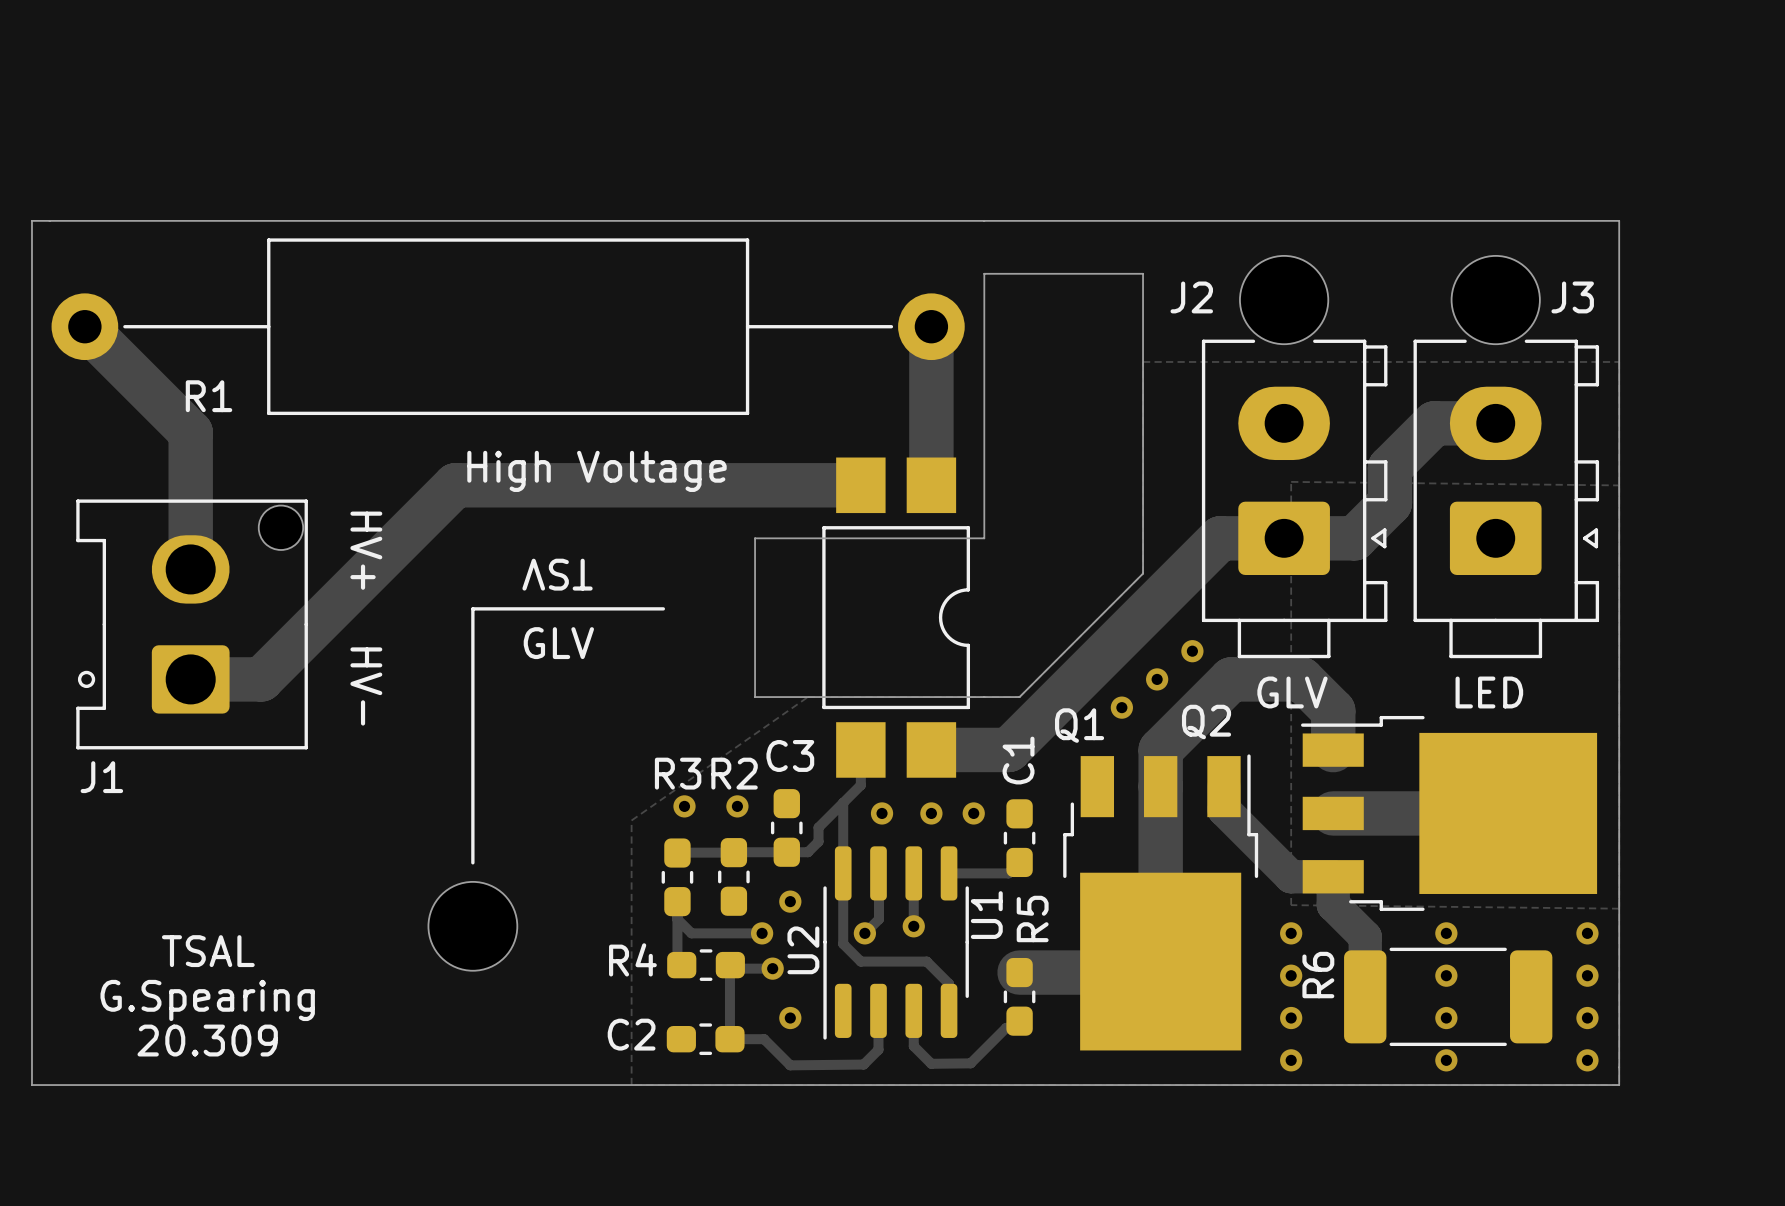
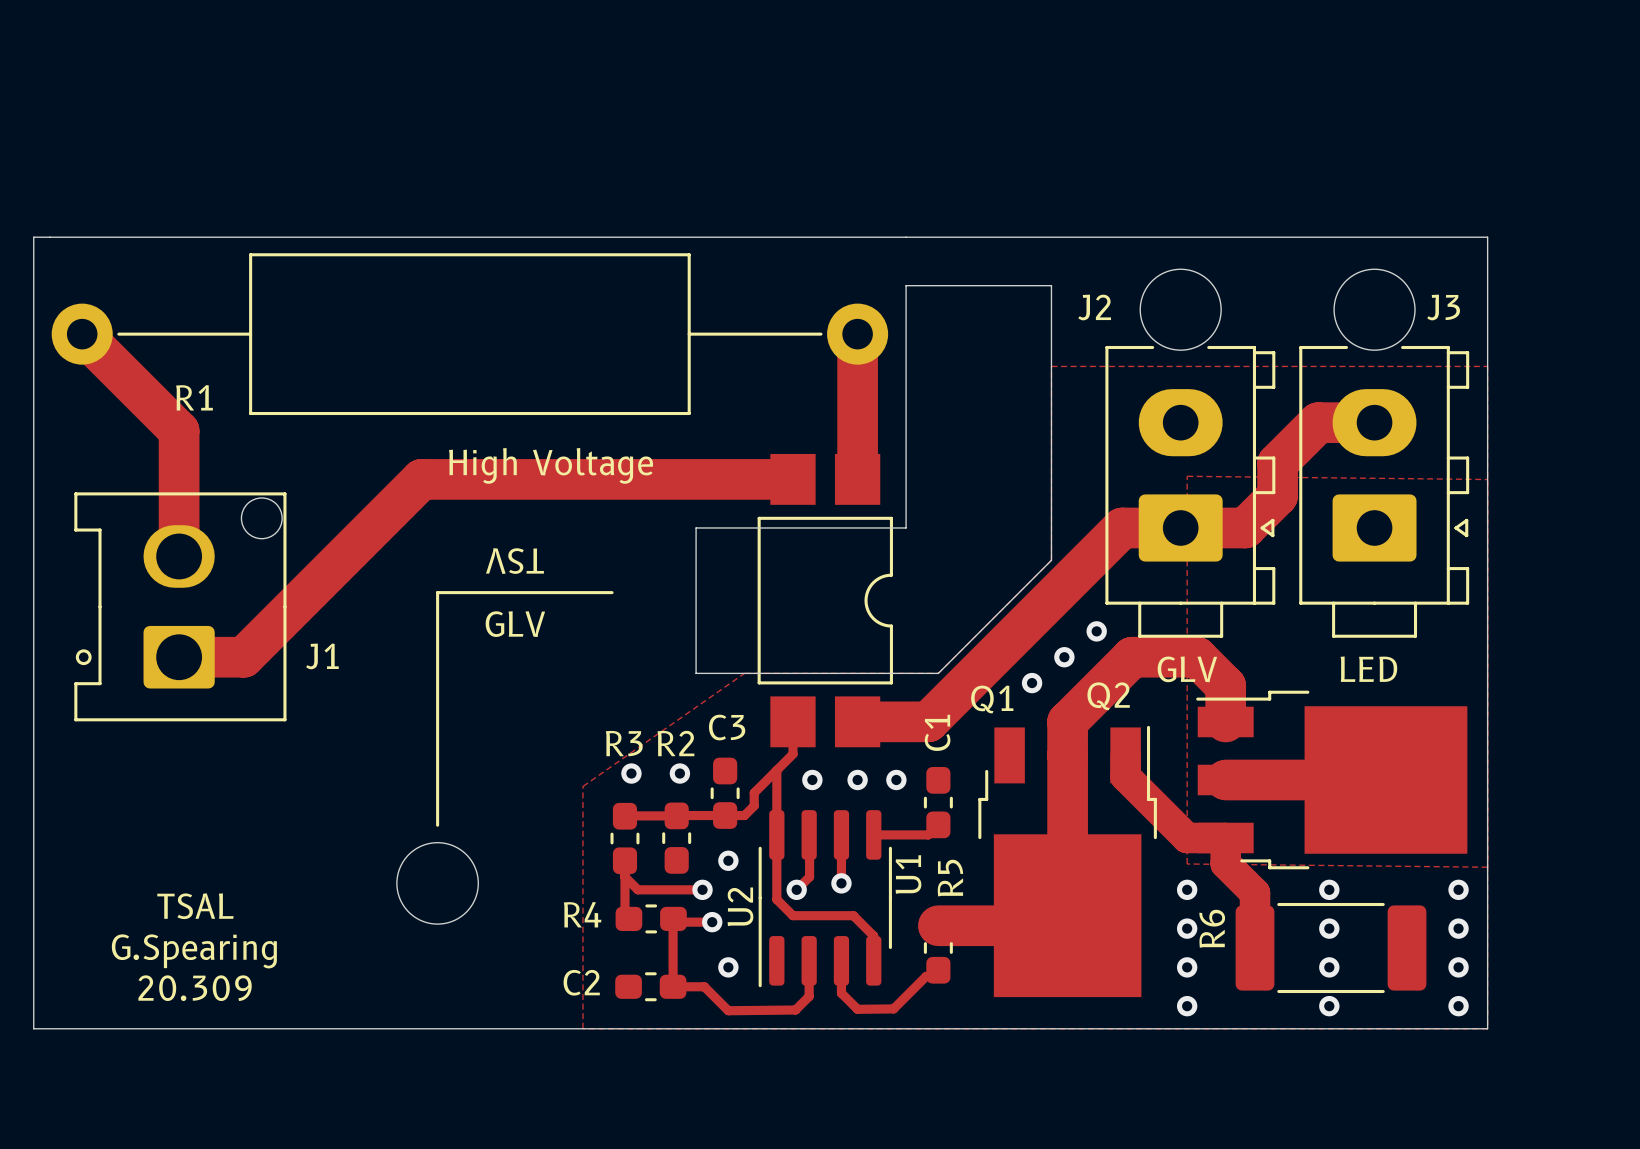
text: HV+ (366, 550) -> none
text: HV- (366, 686) -> none
J1 name position: J1 (101, 777) -> J1 (322, 656)

